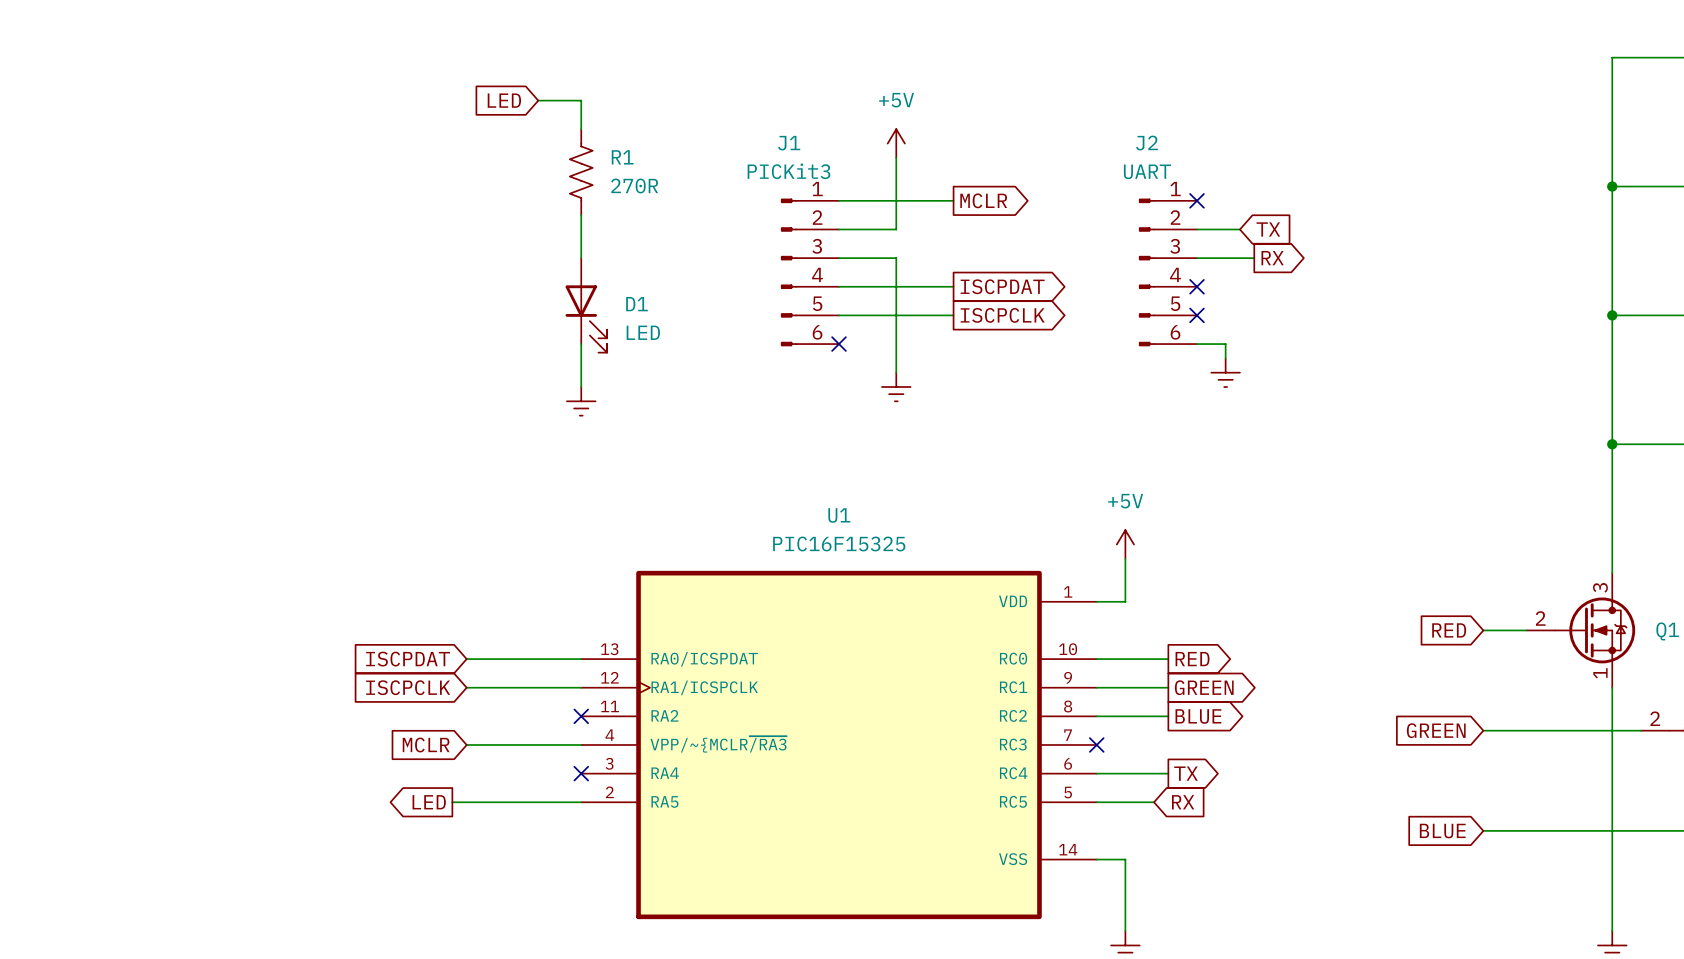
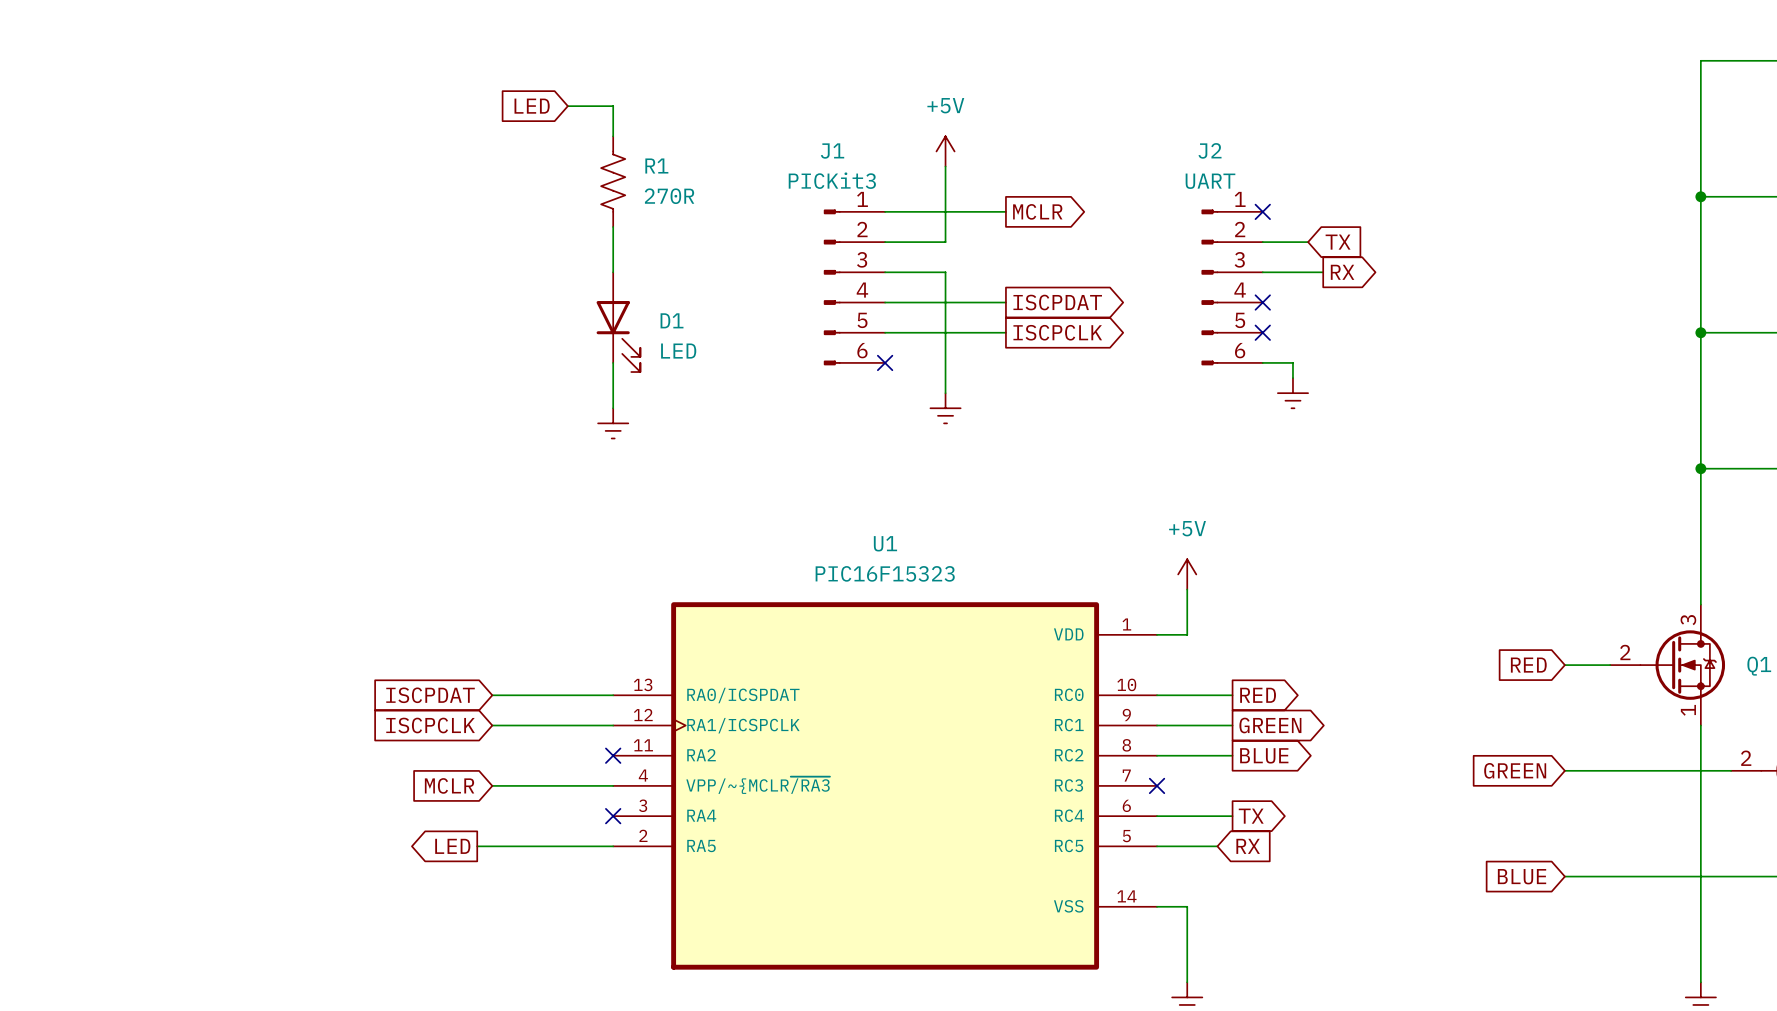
U1 value: PIC16F15325 (839, 543) -> PIC16F15323 (885, 573)

